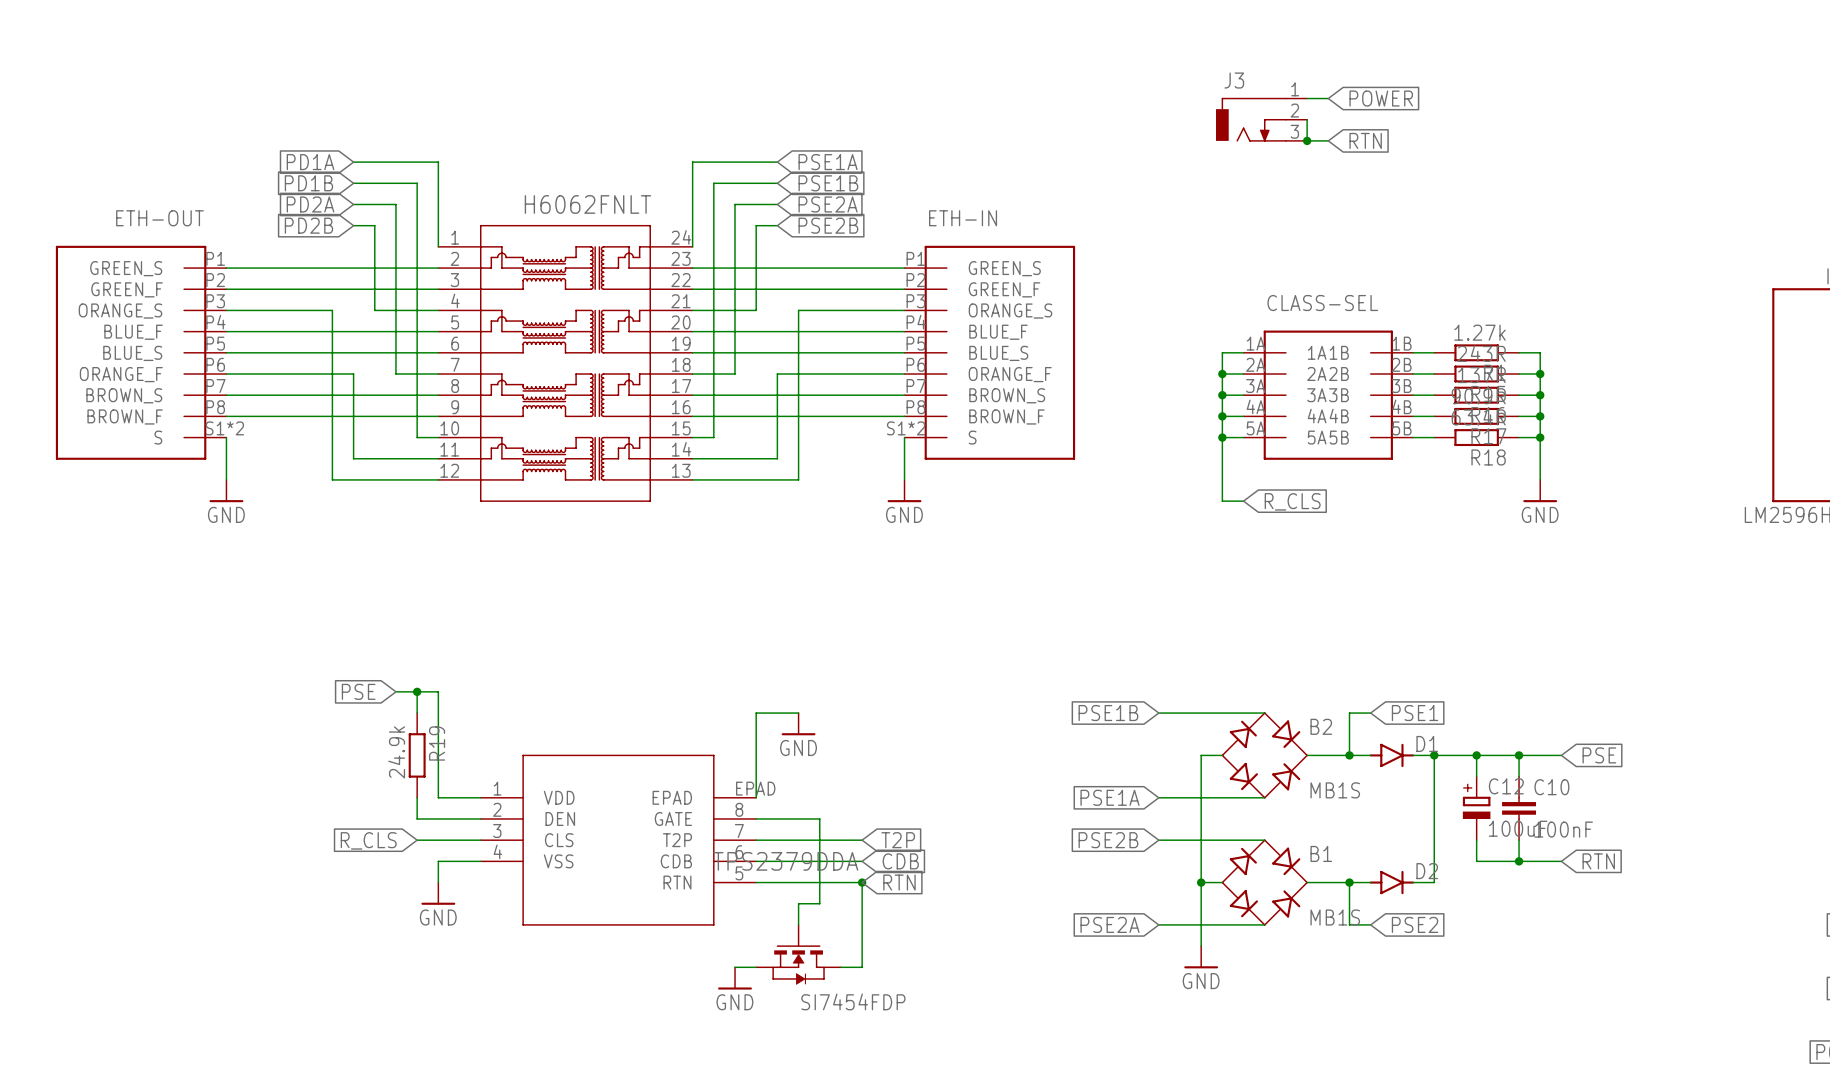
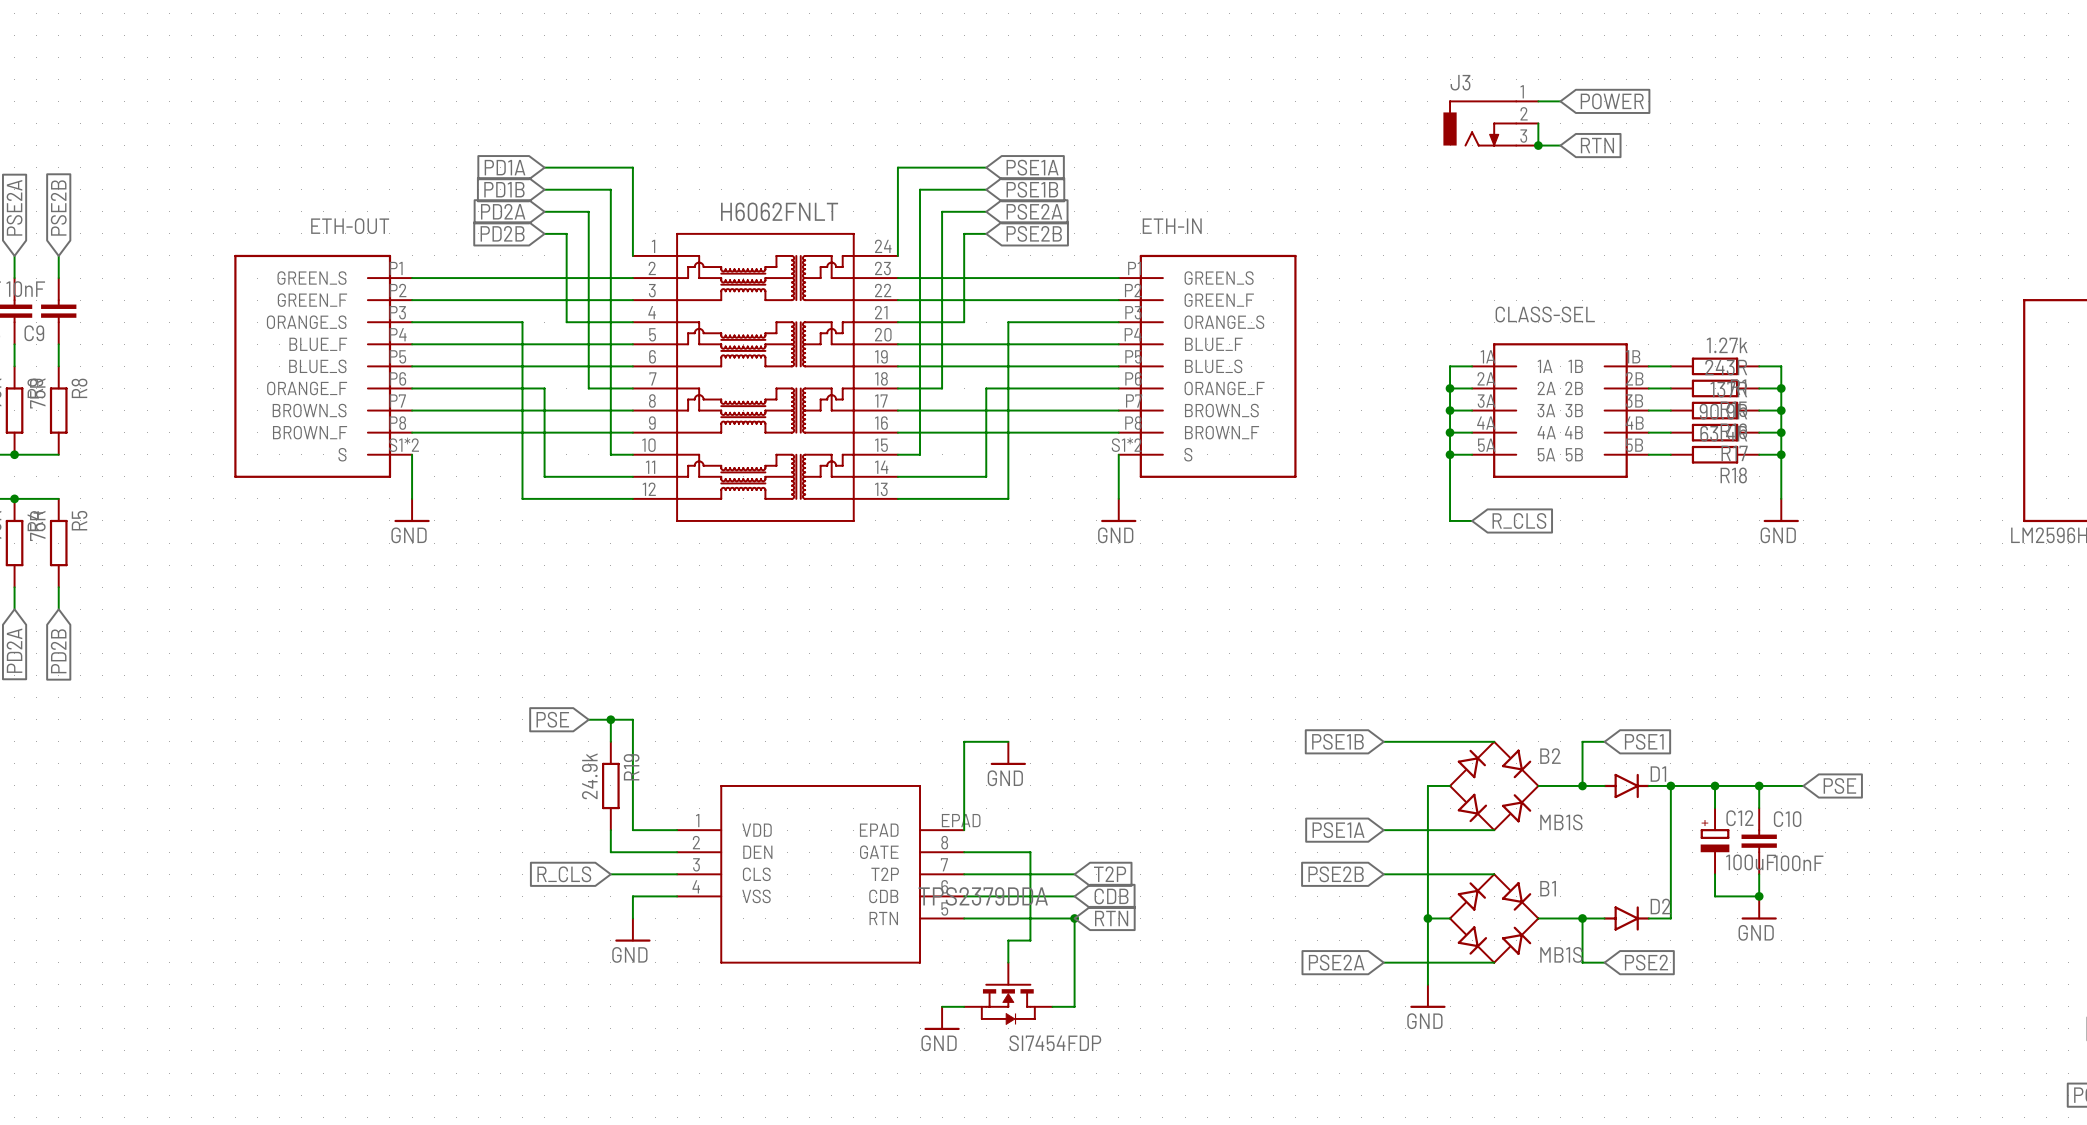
wire: (1519, 861) (1561, 861) -> none
global label: RTN (1598, 861) -> none
power symbol: none -> GND (1759, 908)

